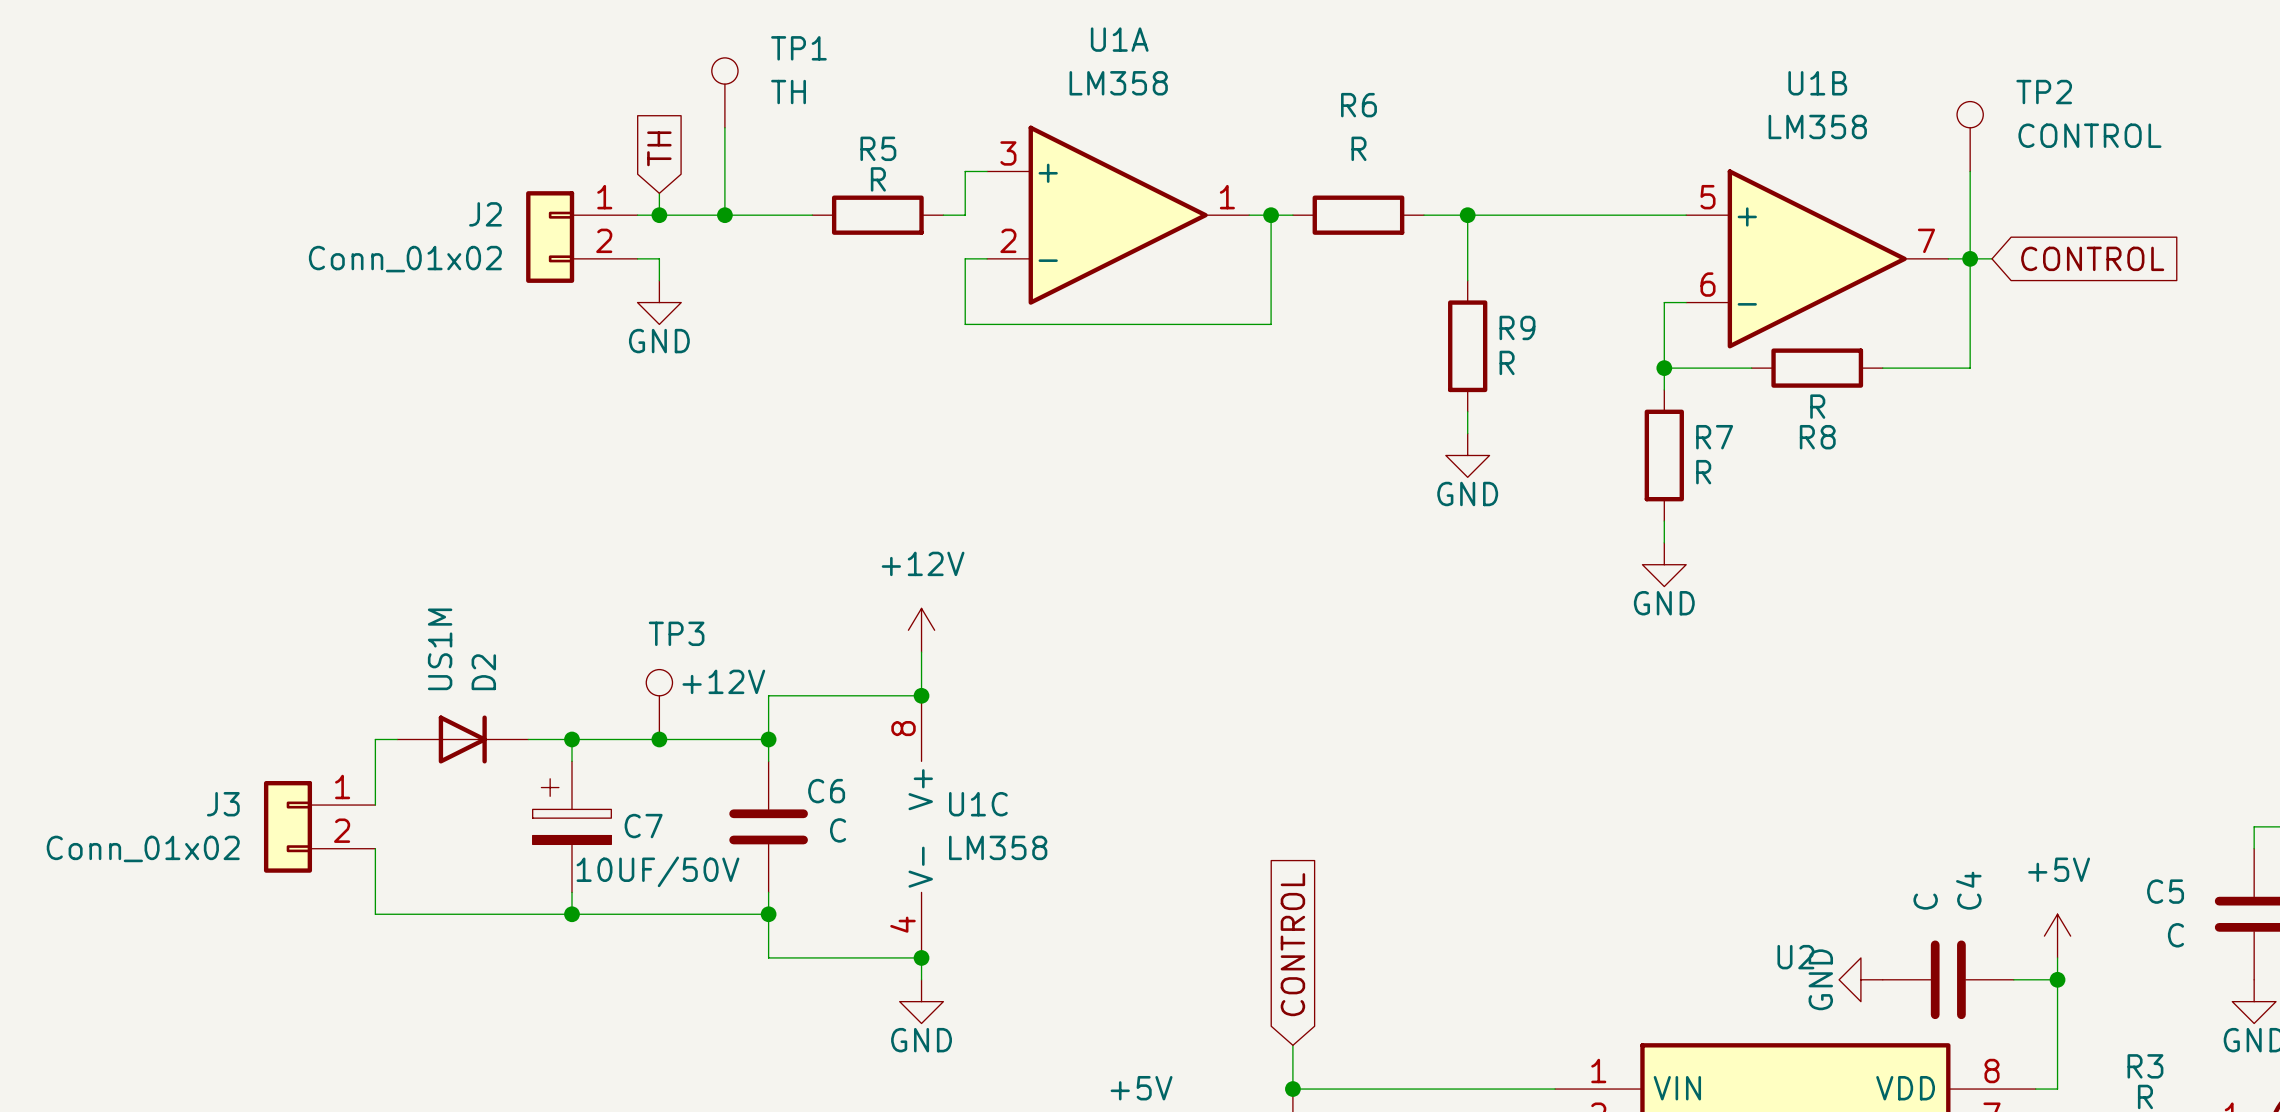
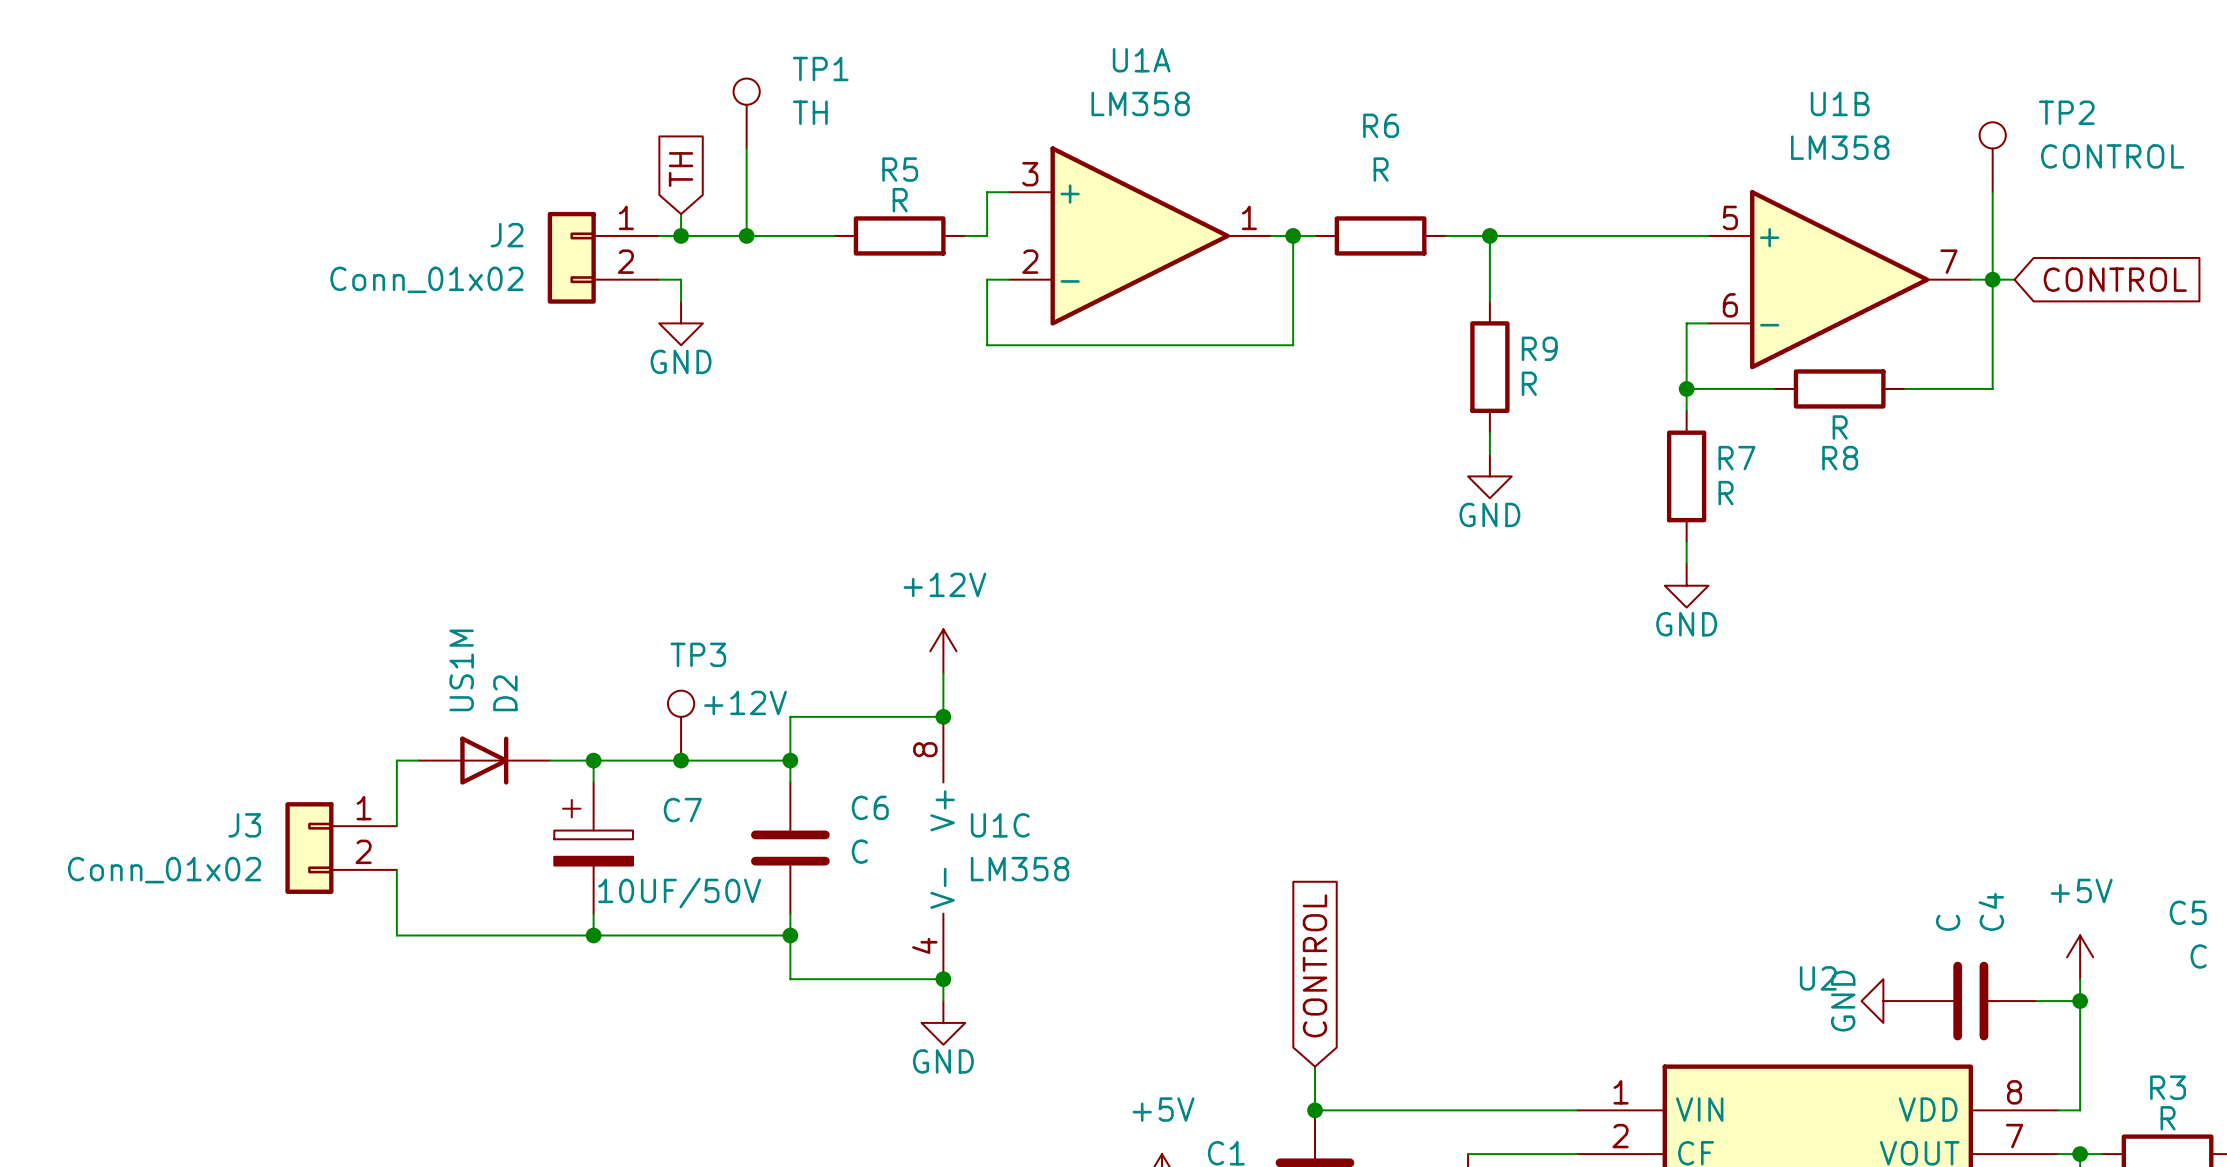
C6 name position: C6 (826, 791) -> C6 (870, 807)
C7 name position: C7 (643, 826) -> C7 (682, 810)

